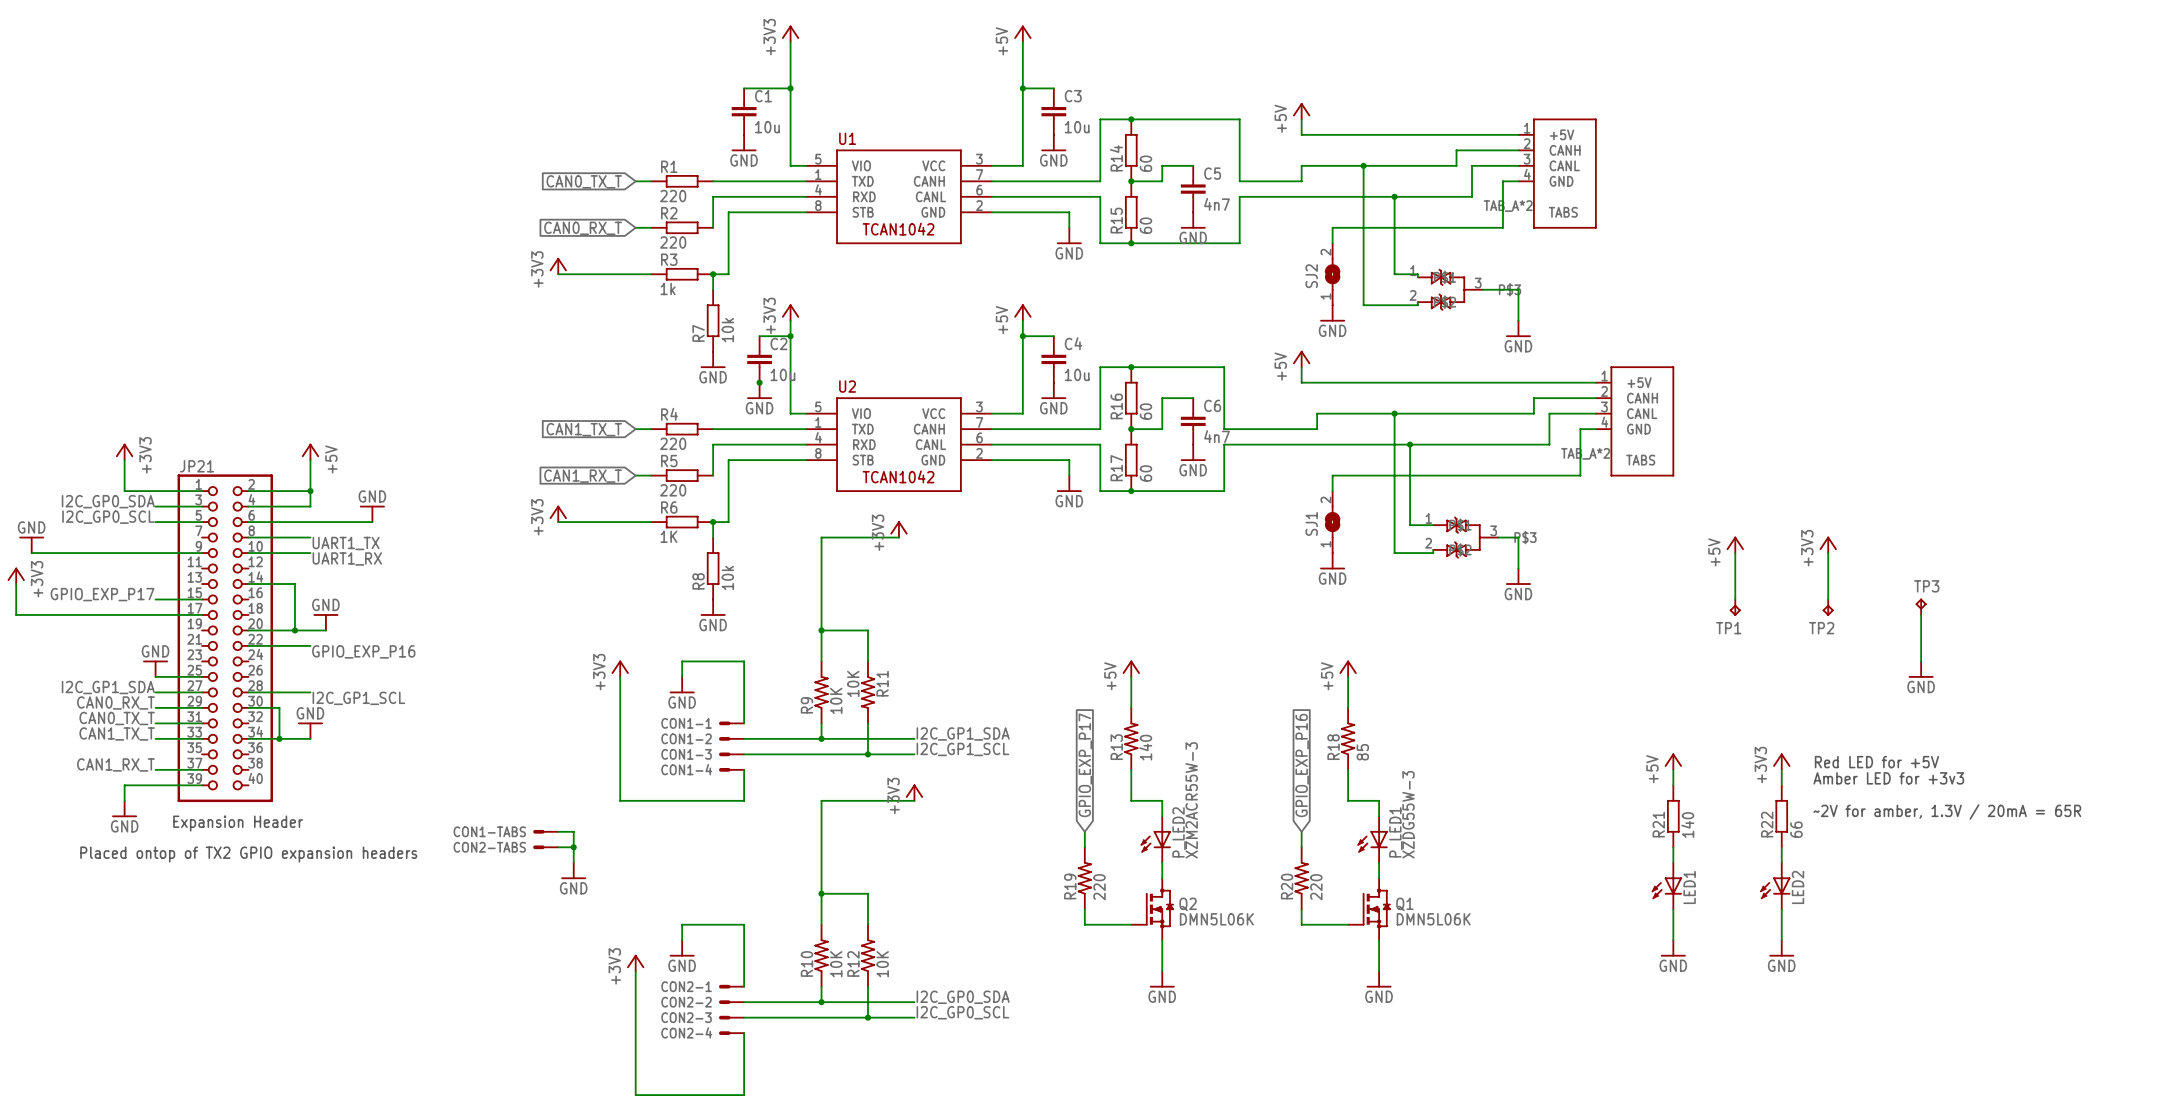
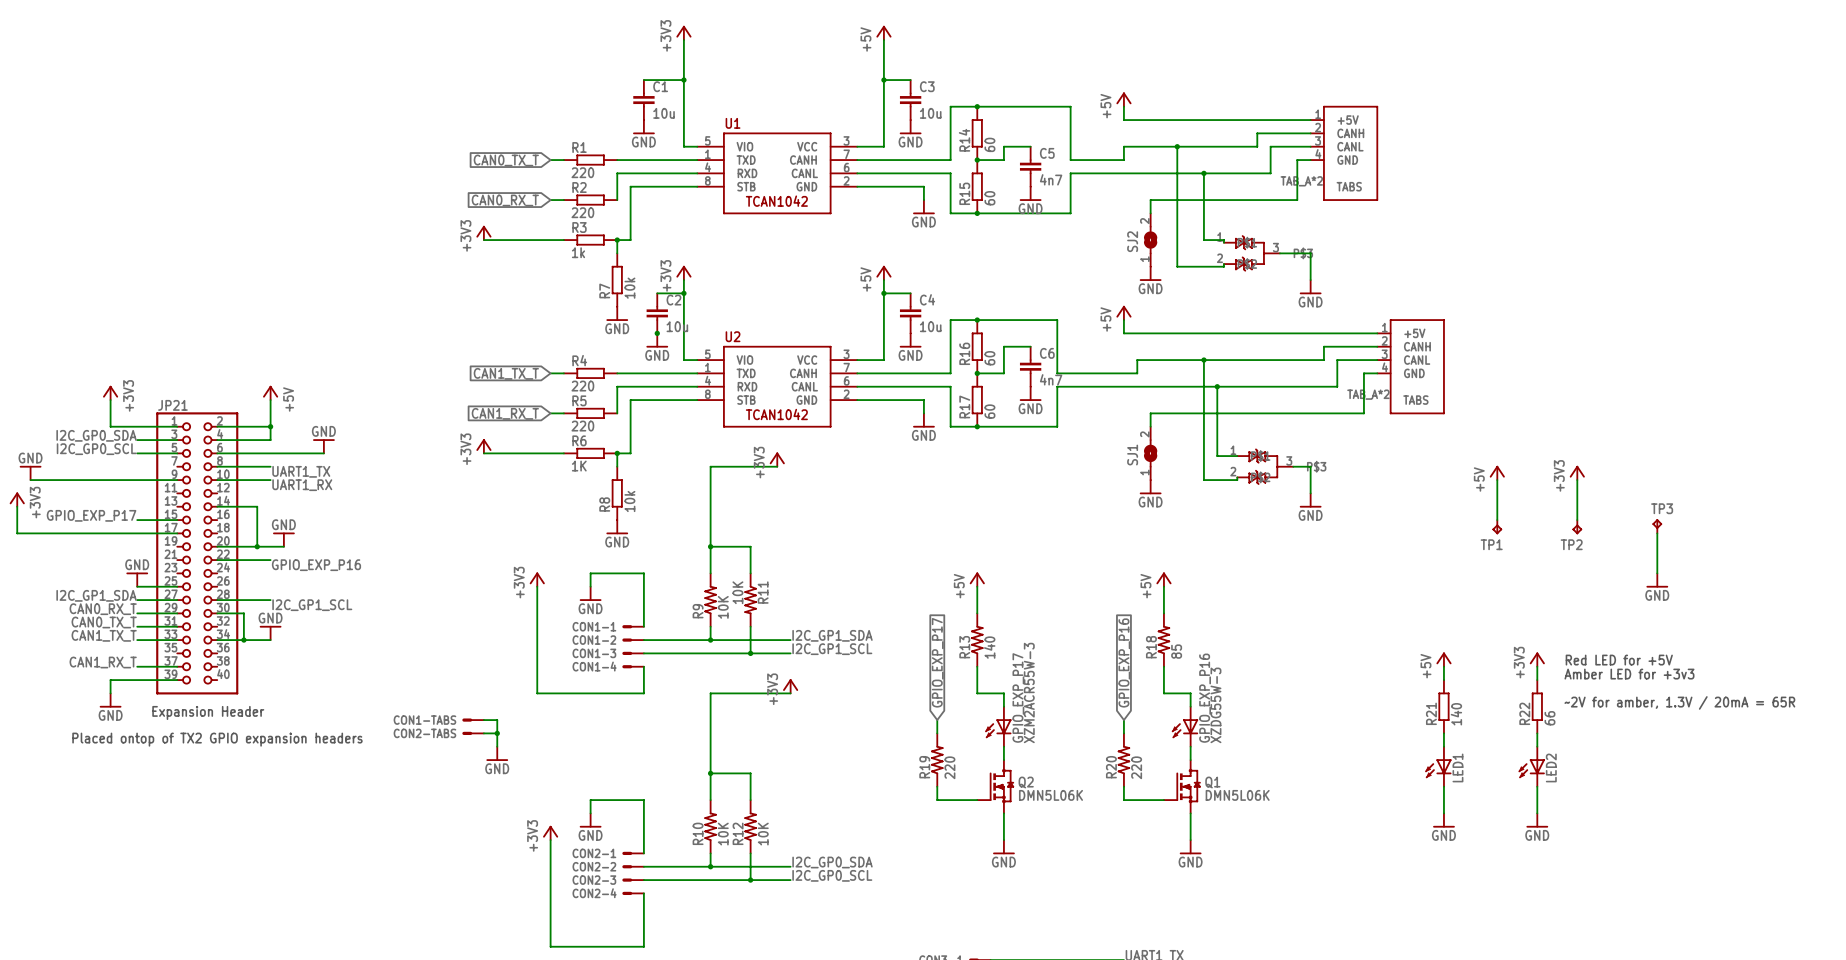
P_LED2 name: P_LED2 (1179, 832) -> GPIO_EXP_P17 (1018, 697)
P_LED1 name: P_LED1 (1395, 832) -> GPIO_EXP_P16 (1205, 698)

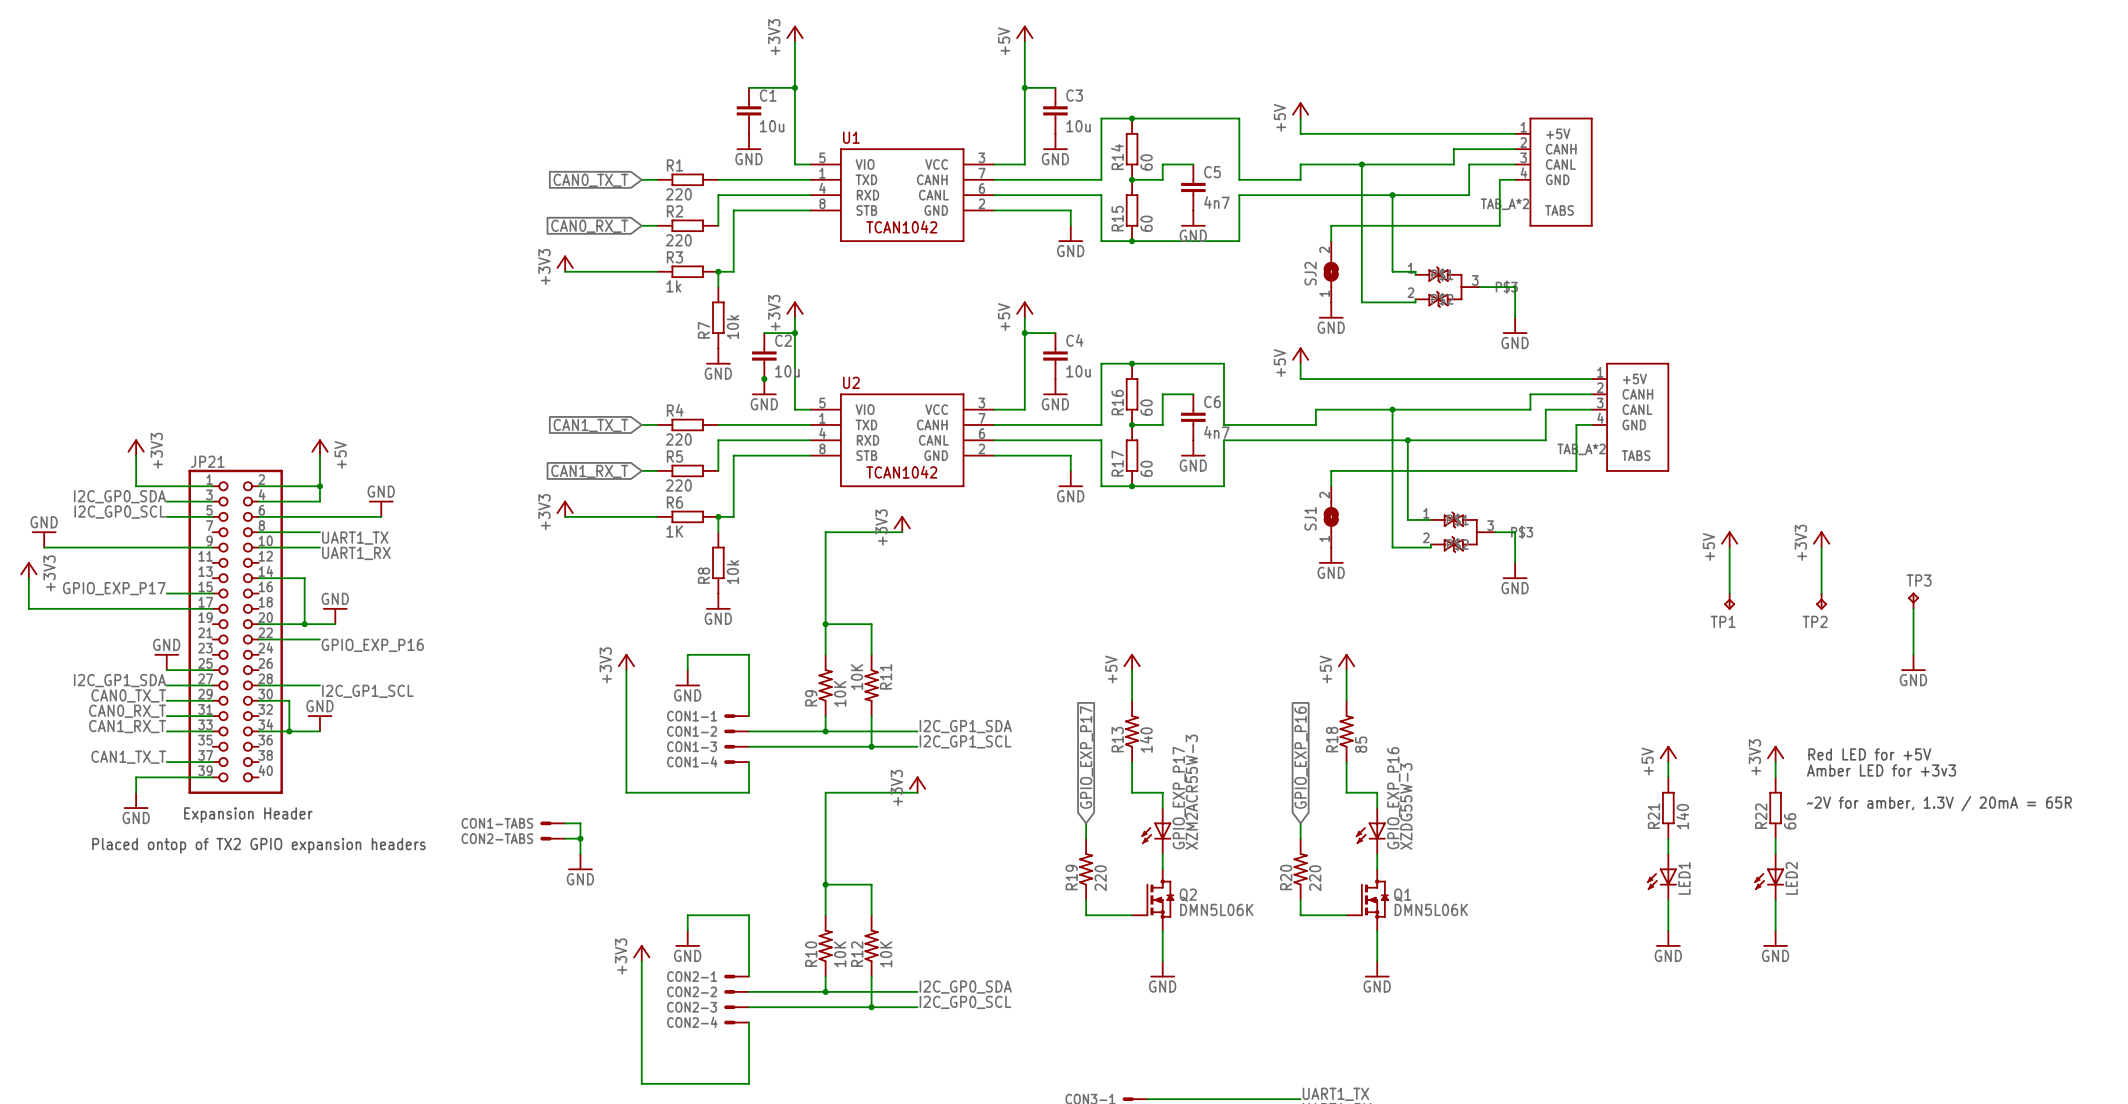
label: CAN0_RX_T (103, 609) -> CAN0_TX_T (128, 695)
label: CAN0_TX_T (104, 622) -> CAN0_RX_T (127, 711)
label: CAN1_TX_T (104, 635) -> CAN1_RX_T (127, 726)
label: CAN1_RX_T (103, 662) -> CAN1_TX_T (128, 757)

